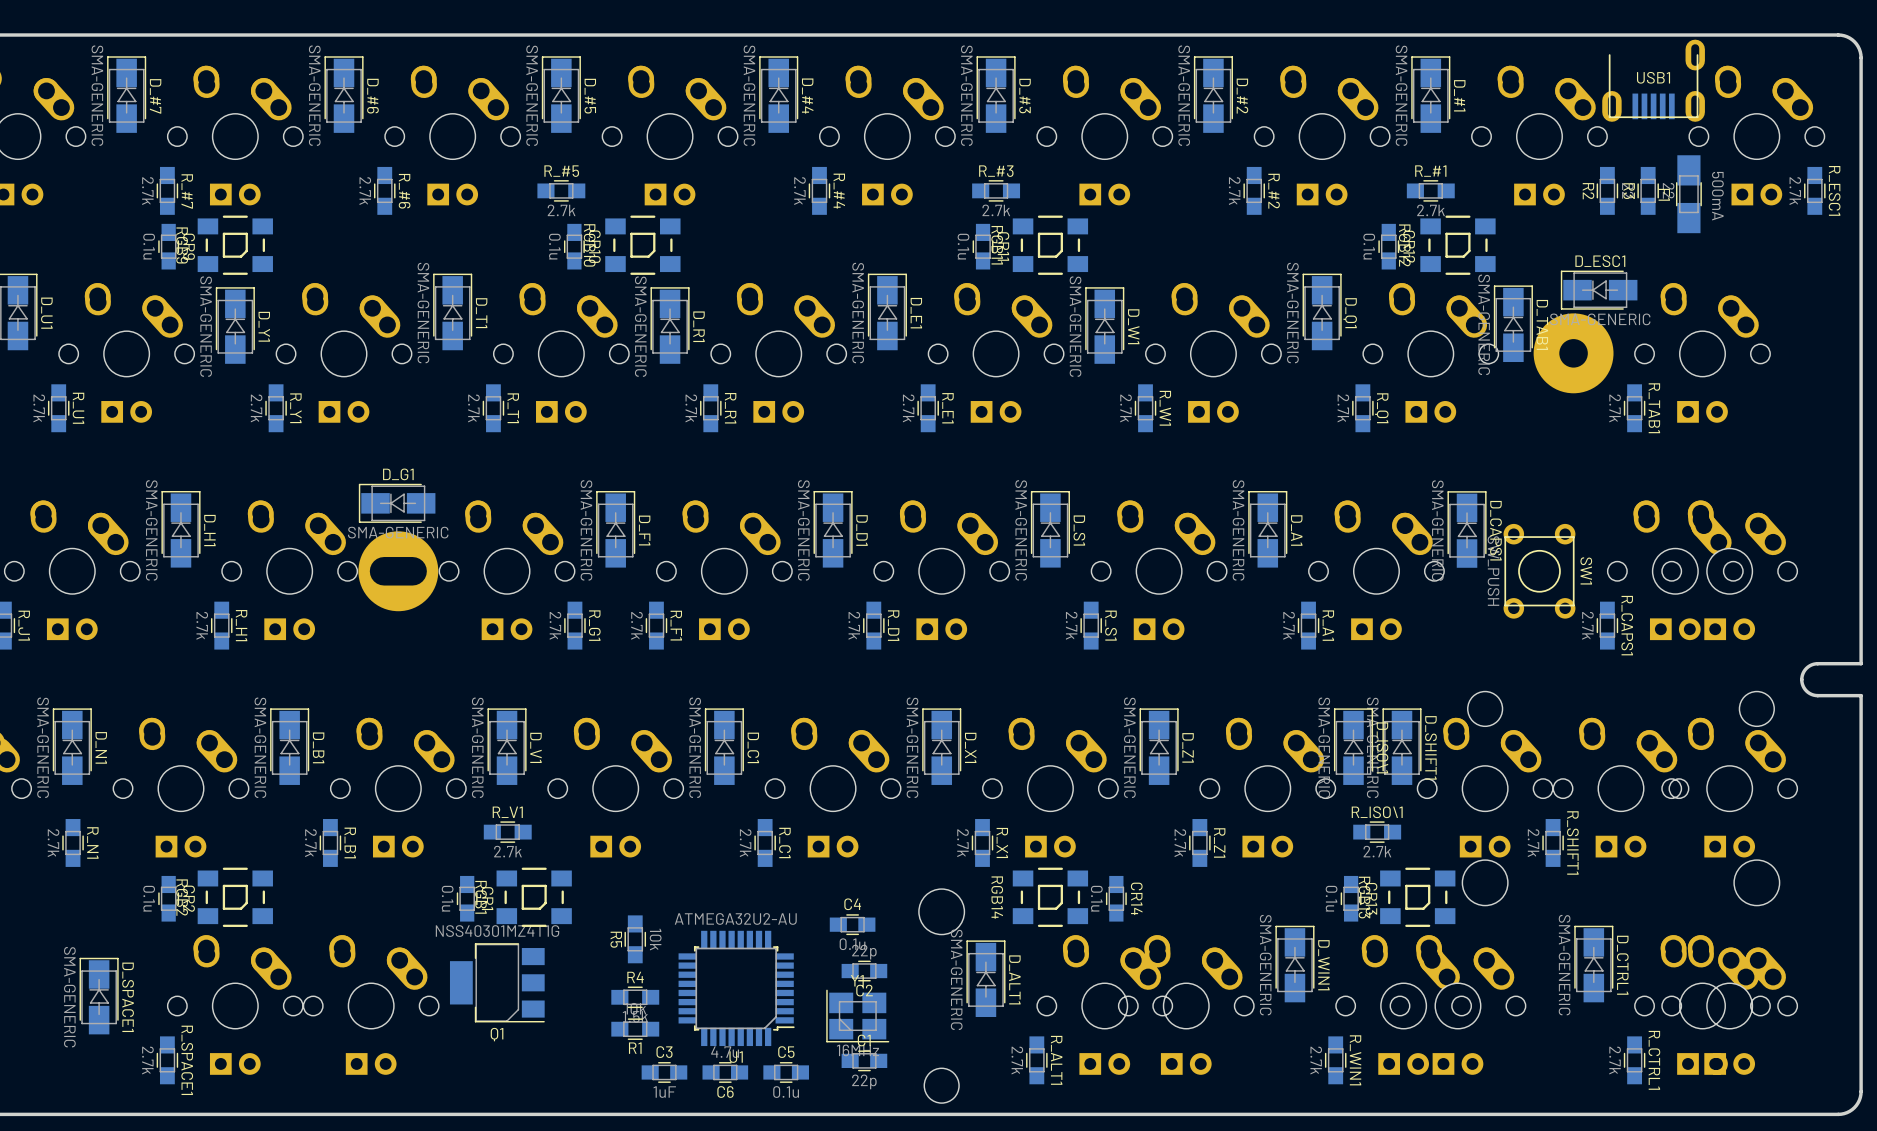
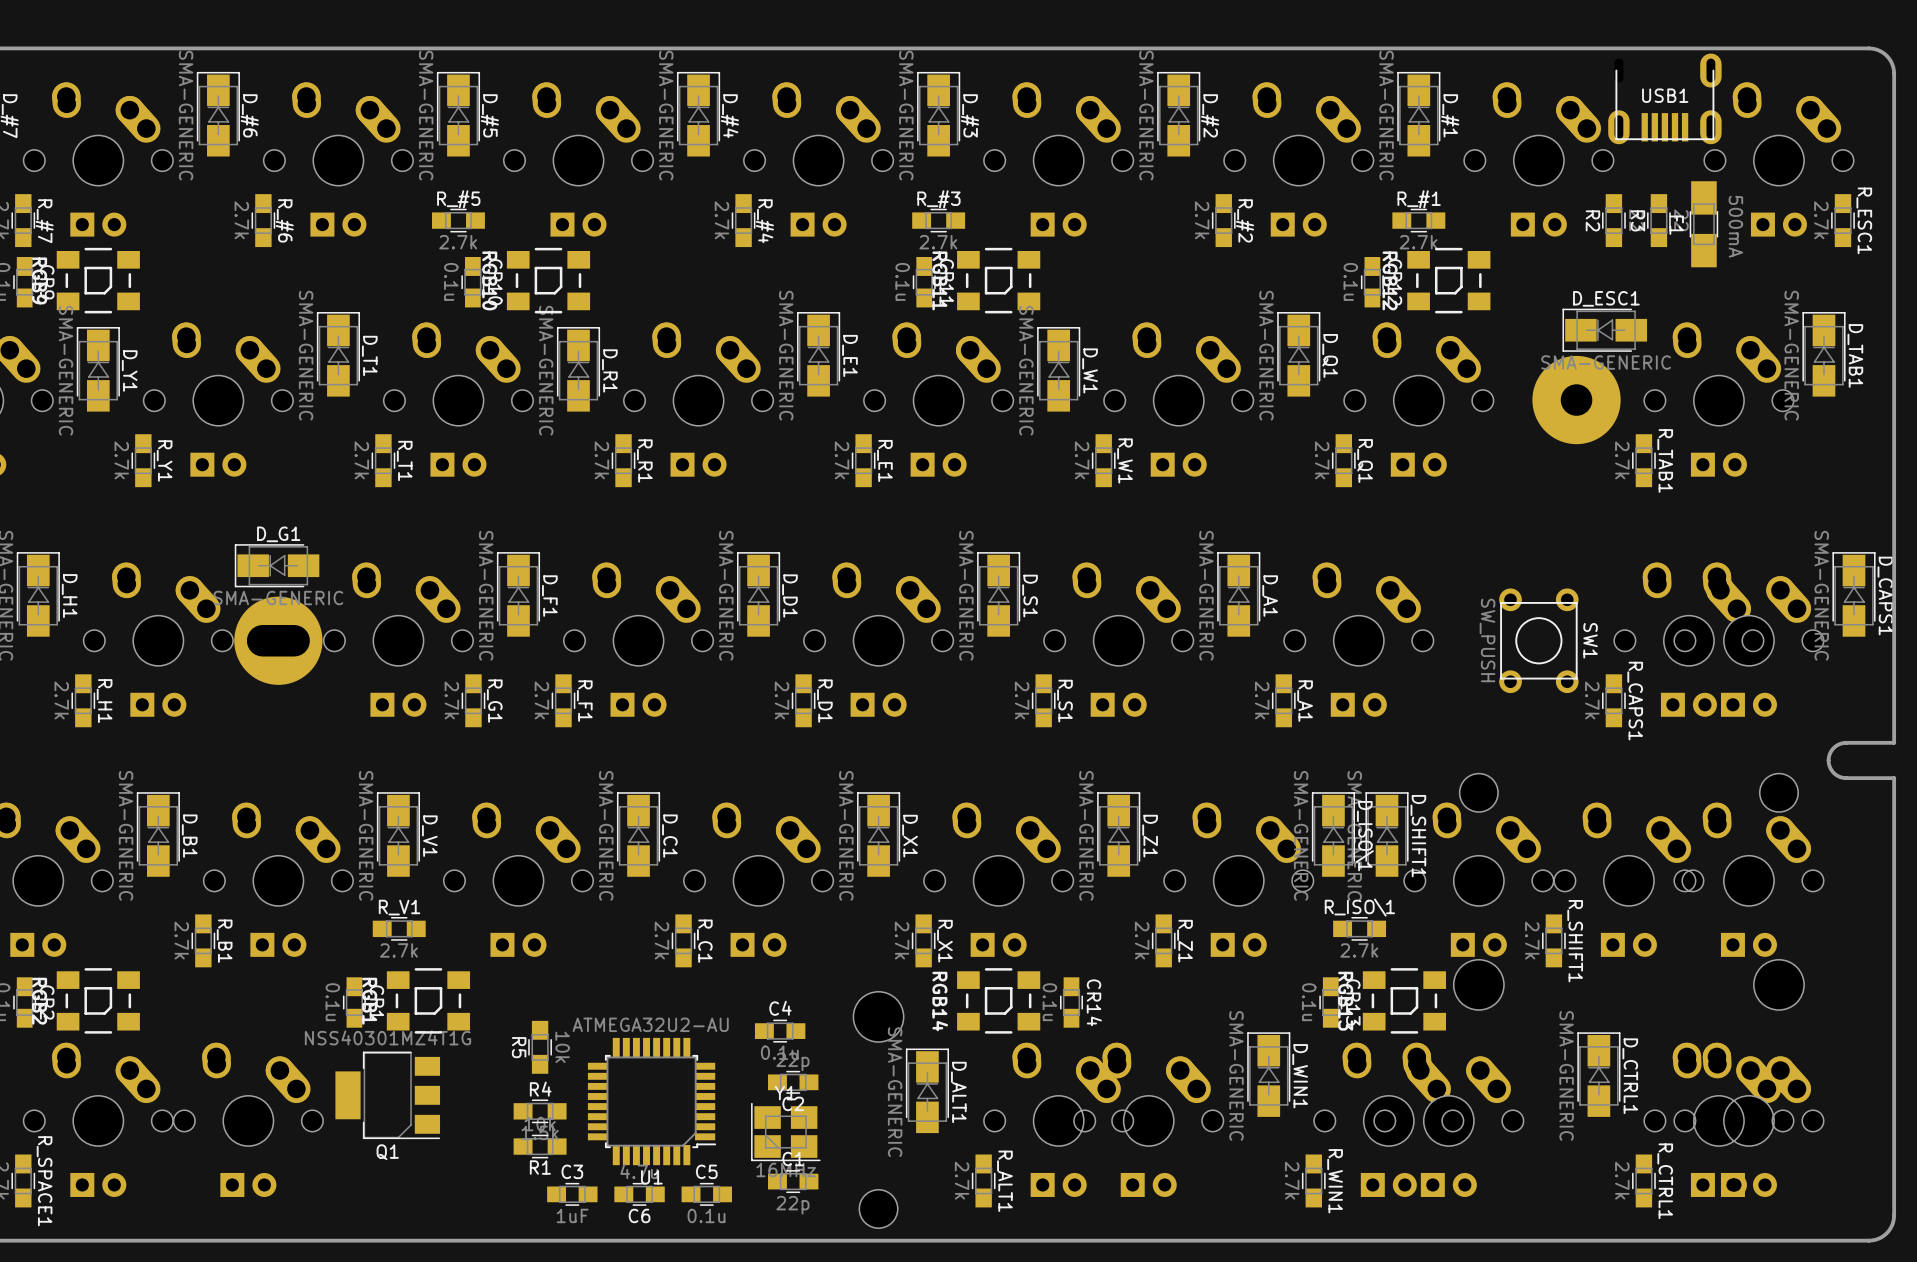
D_TAB1 position: (1513, 323) -> (1823, 354)
D_CAPS1 position: (1467, 529) -> (1853, 594)

